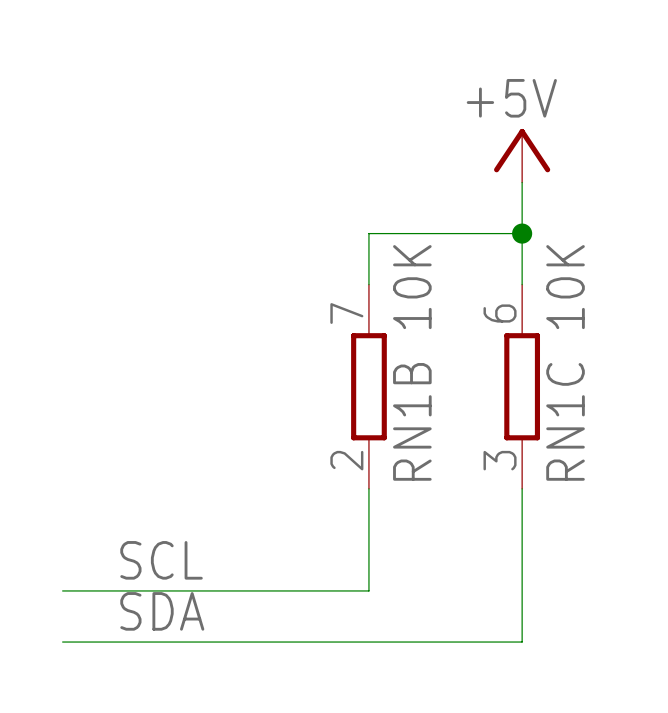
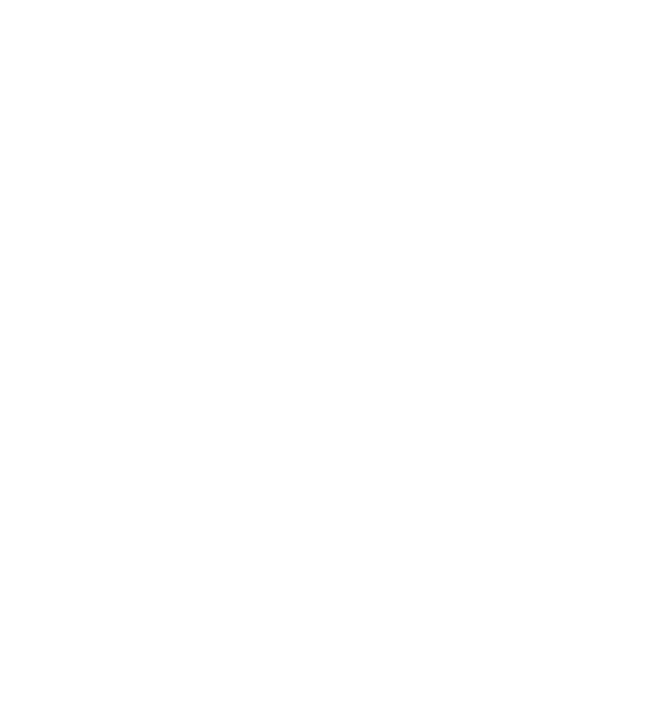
power symbol: +5V (522, 155) -> none
wire: (522, 182) (522, 284) -> none
wire: (522, 233) (368, 233) (368, 284) -> none
junction: (522, 233) -> none
RN1B: 10K (368, 386) -> none
RN1C: 10K (522, 386) -> none
wire: (368, 488) (368, 590) (62, 590) -> none
wire: (522, 488) (522, 642) (62, 642) -> none
label: SCL (161, 560) -> none
label: SDA (162, 611) -> none

